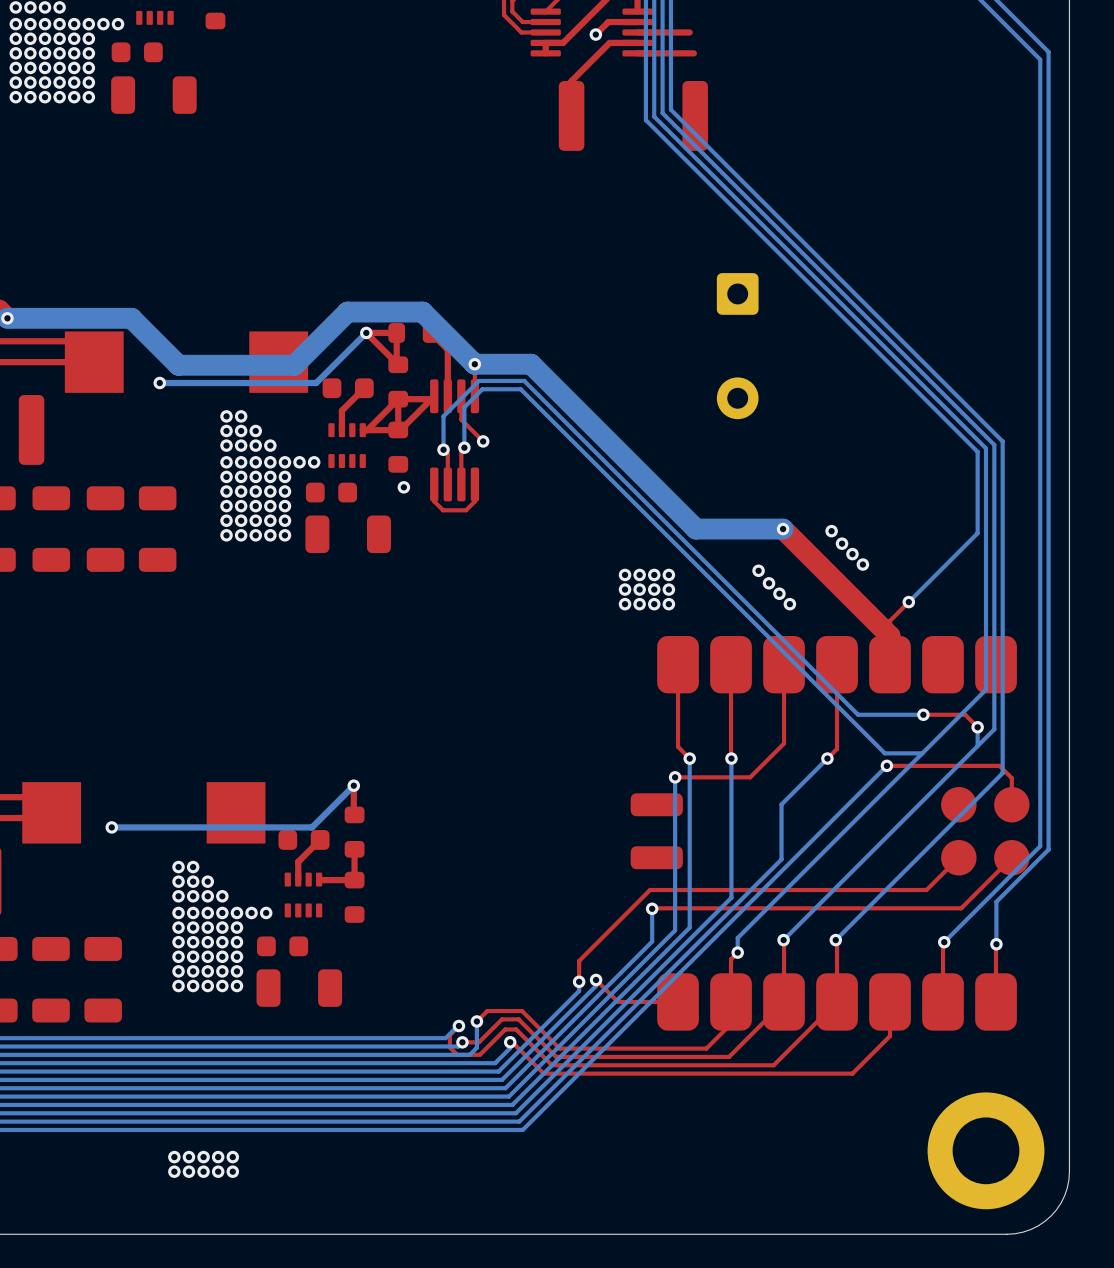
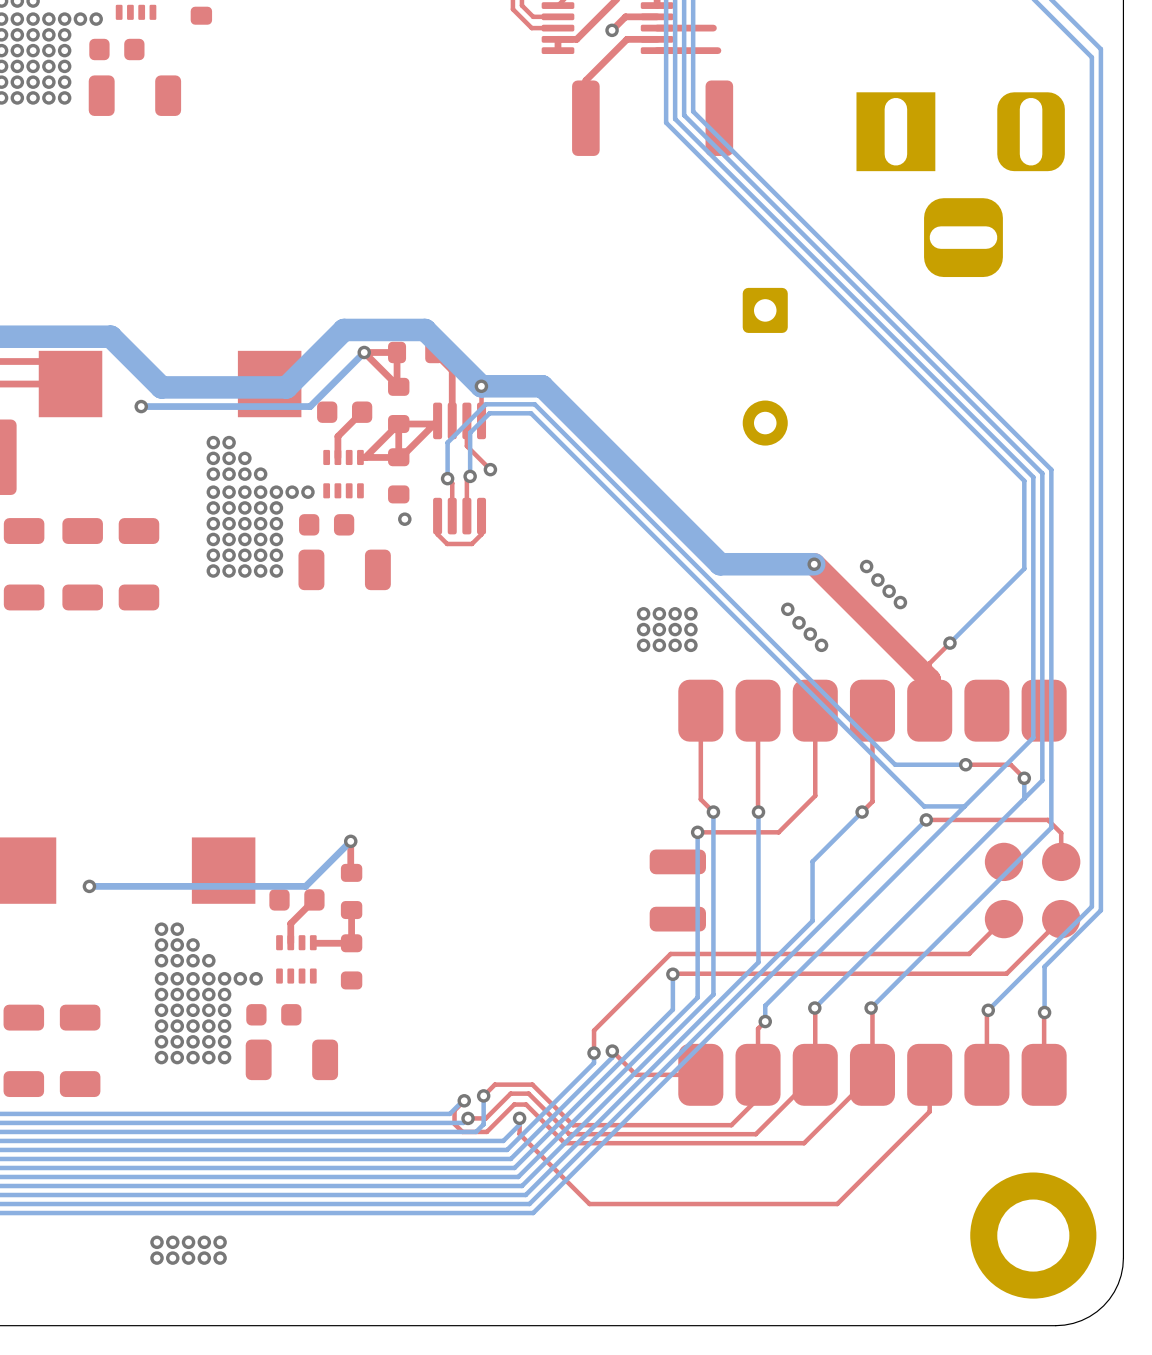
part: none -> (960, 184)
top track: (510, 1042) (543, 1073) (852, 1073) -> (519, 1118) (519, 1134) (589, 1204) (837, 1204) (889, 1152)

